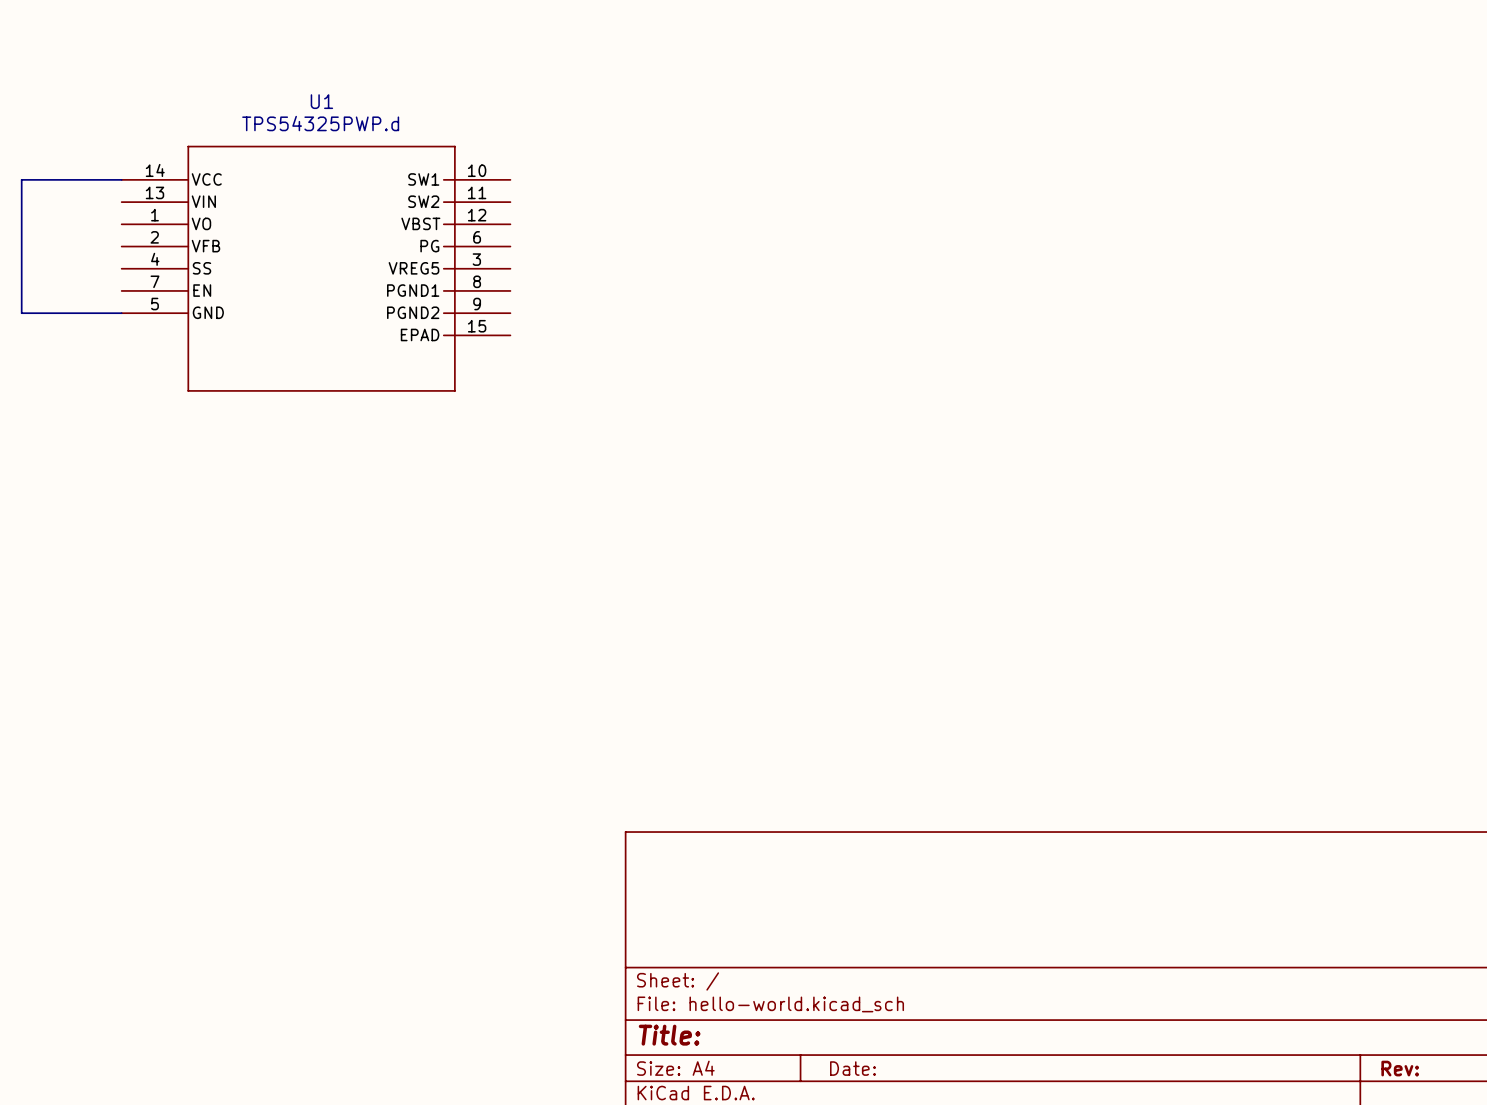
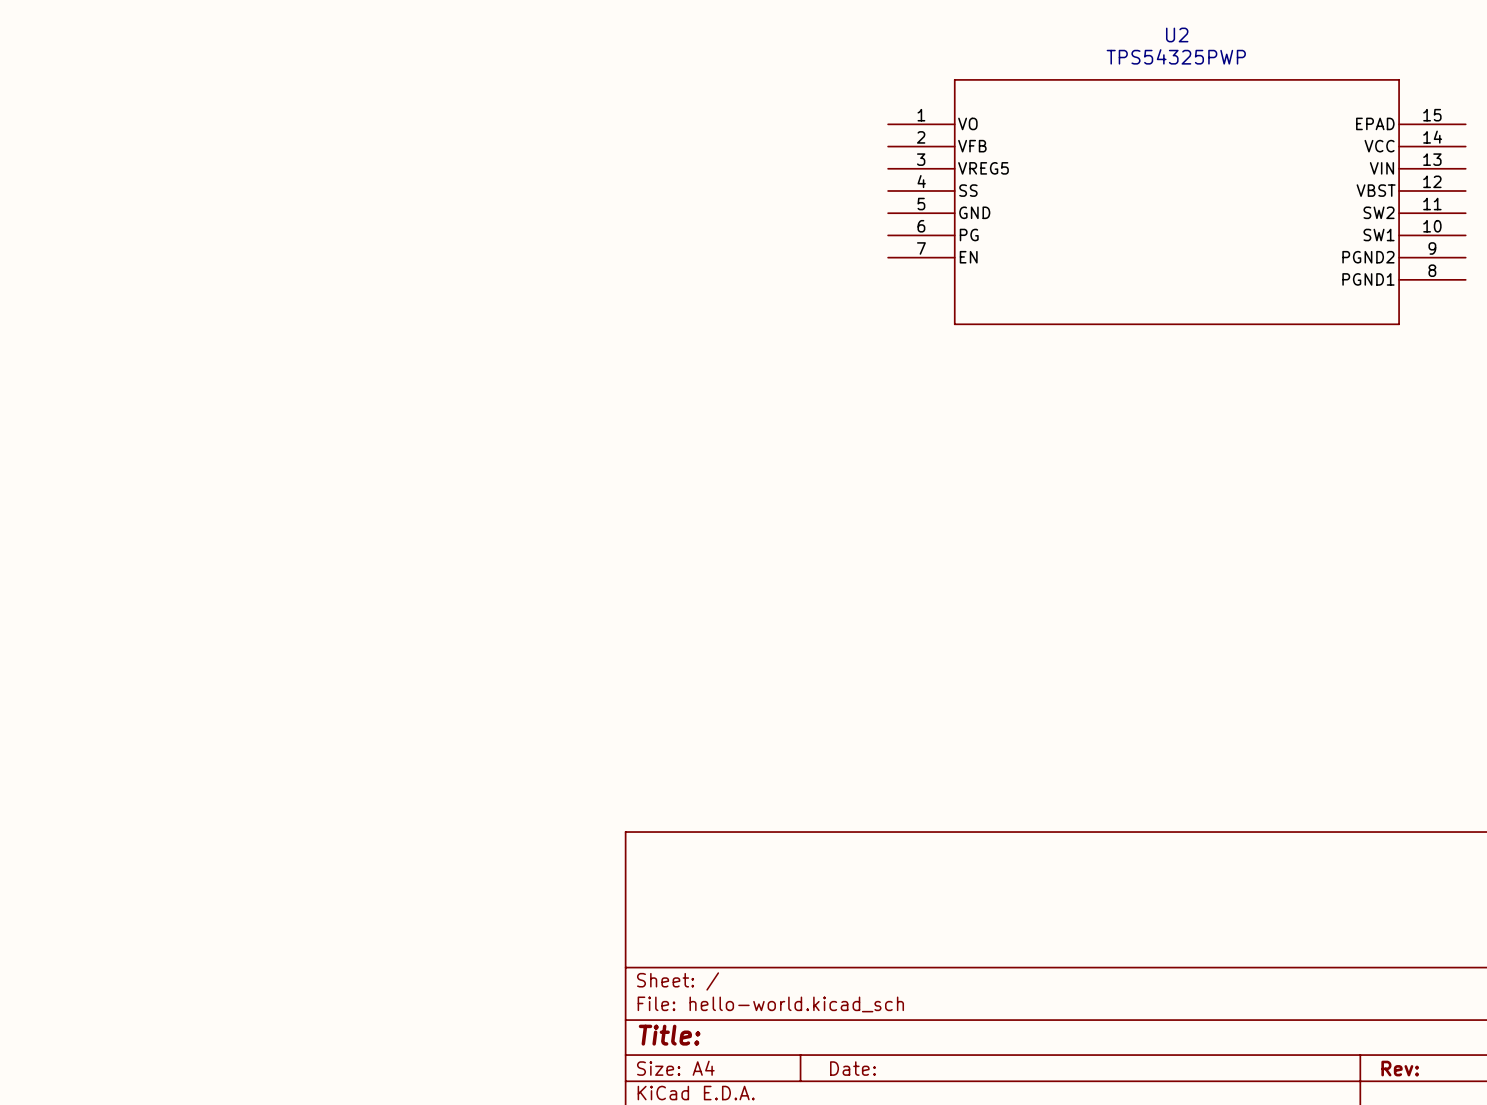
wire: (121, 179) (21, 179) (21, 313) (121, 313) -> none
U2: none -> TPS54325PWP (1176, 202)
U1: TPS54325PWP.d (316, 268) -> none

